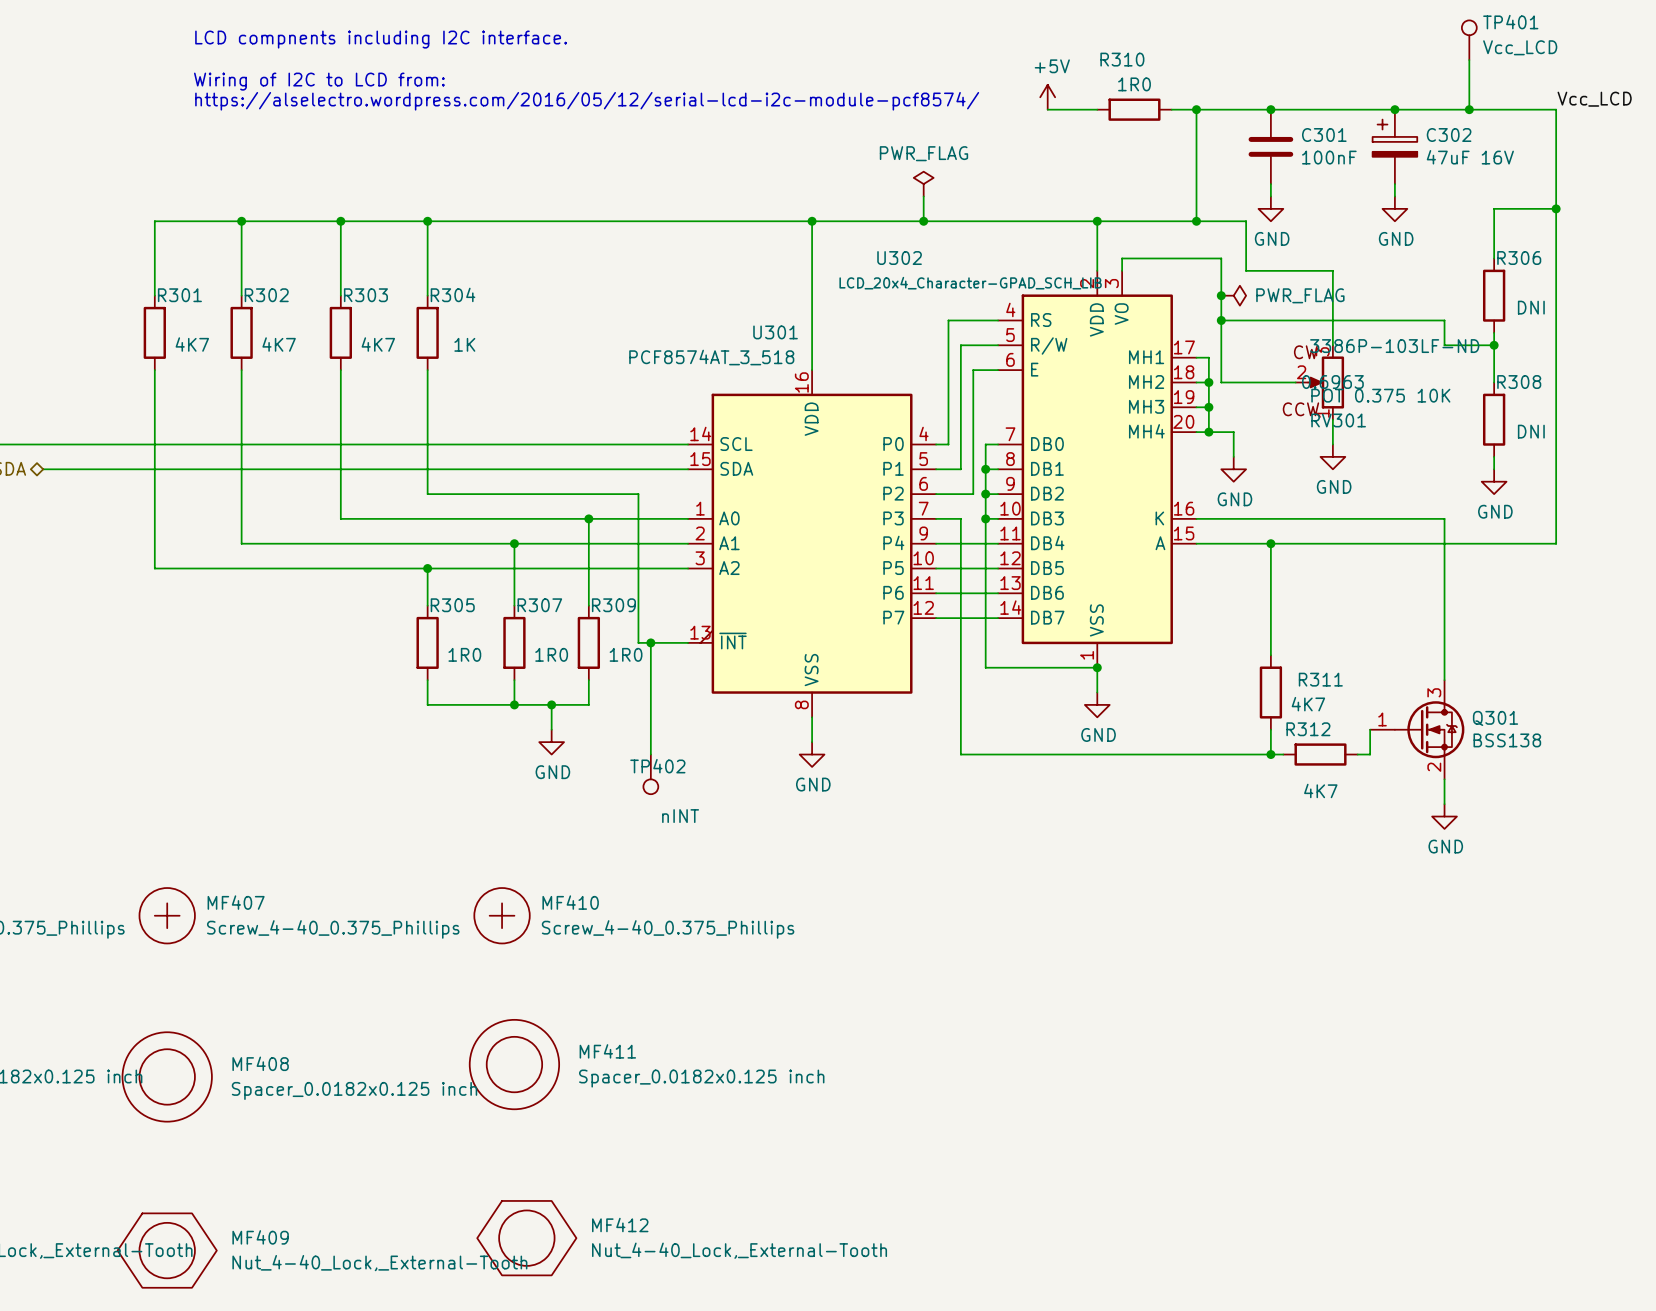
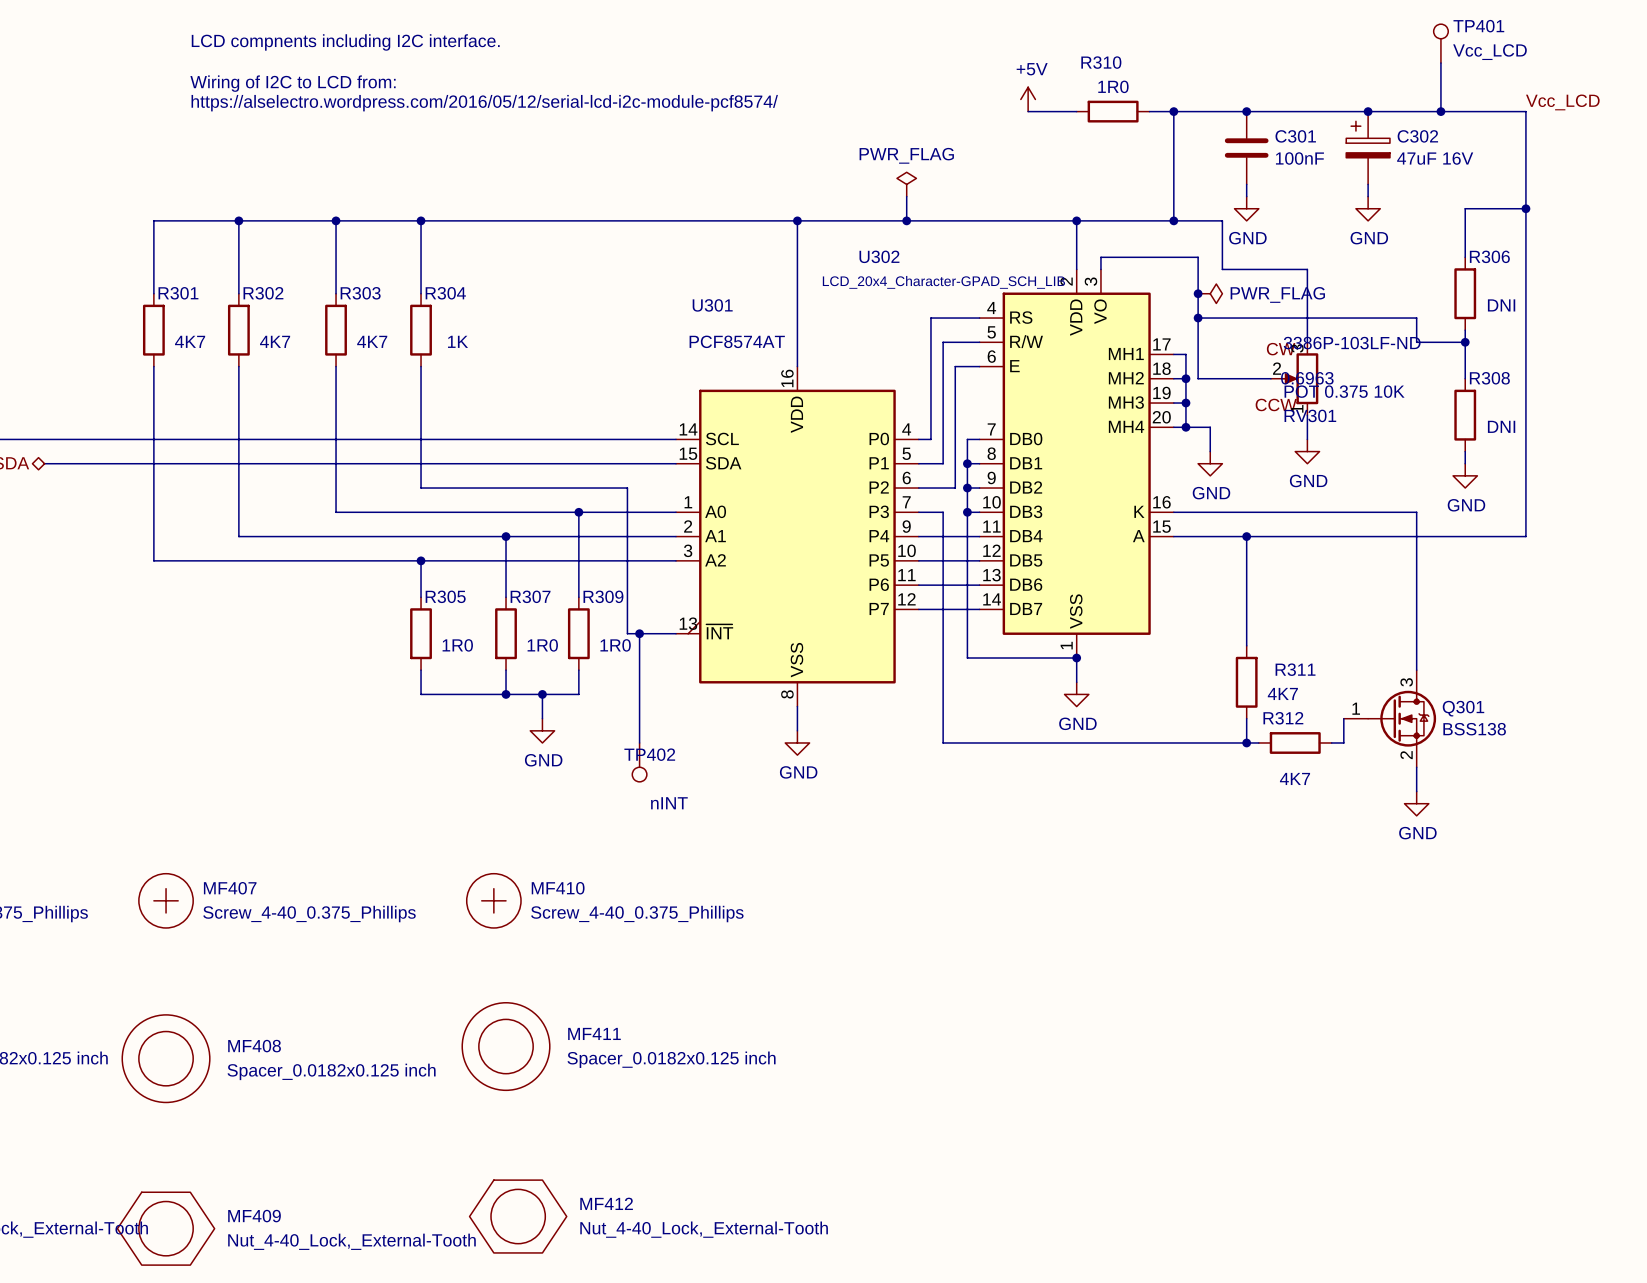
U301 name position: U301 (775, 332) -> U301 (712, 305)
U301 value: PCF8574AT_3_518 (711, 357) -> PCF8574AT (737, 341)

